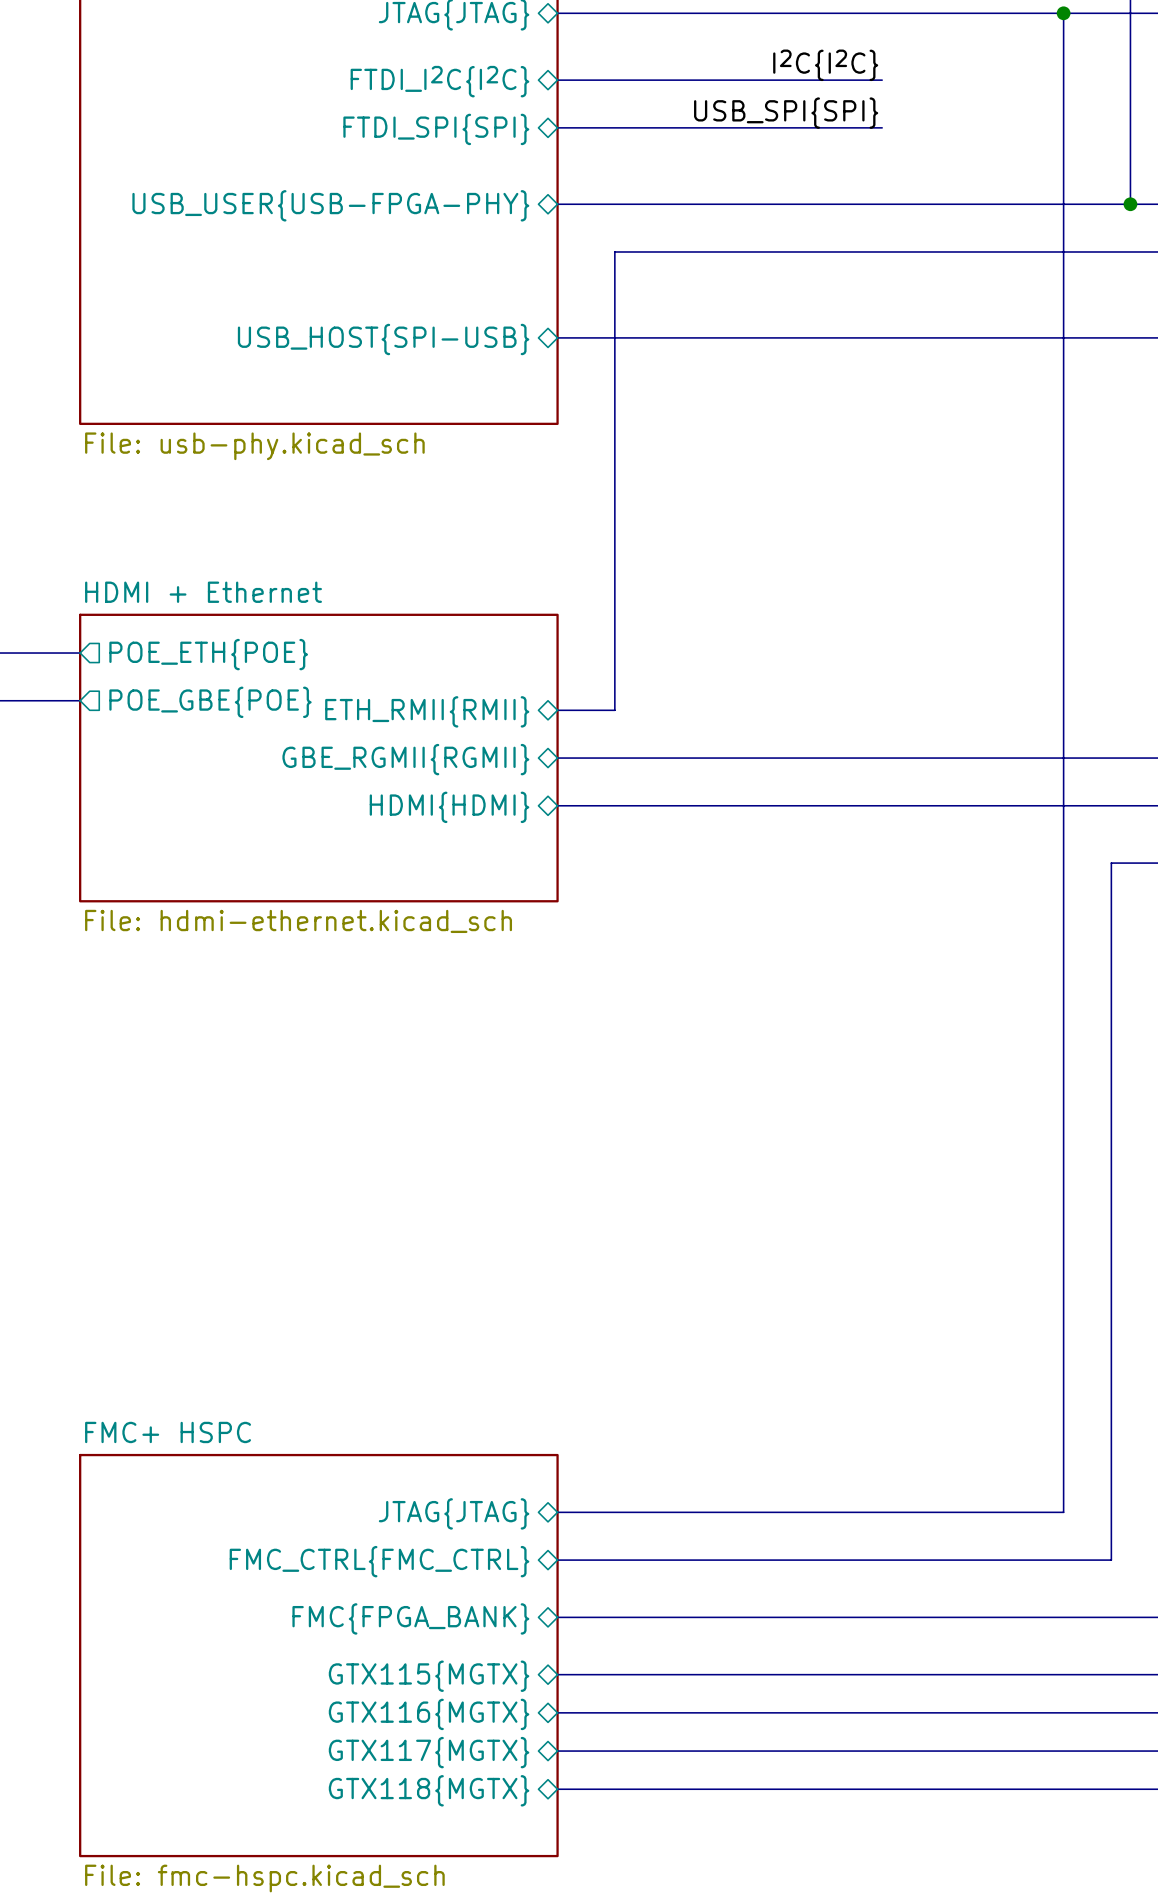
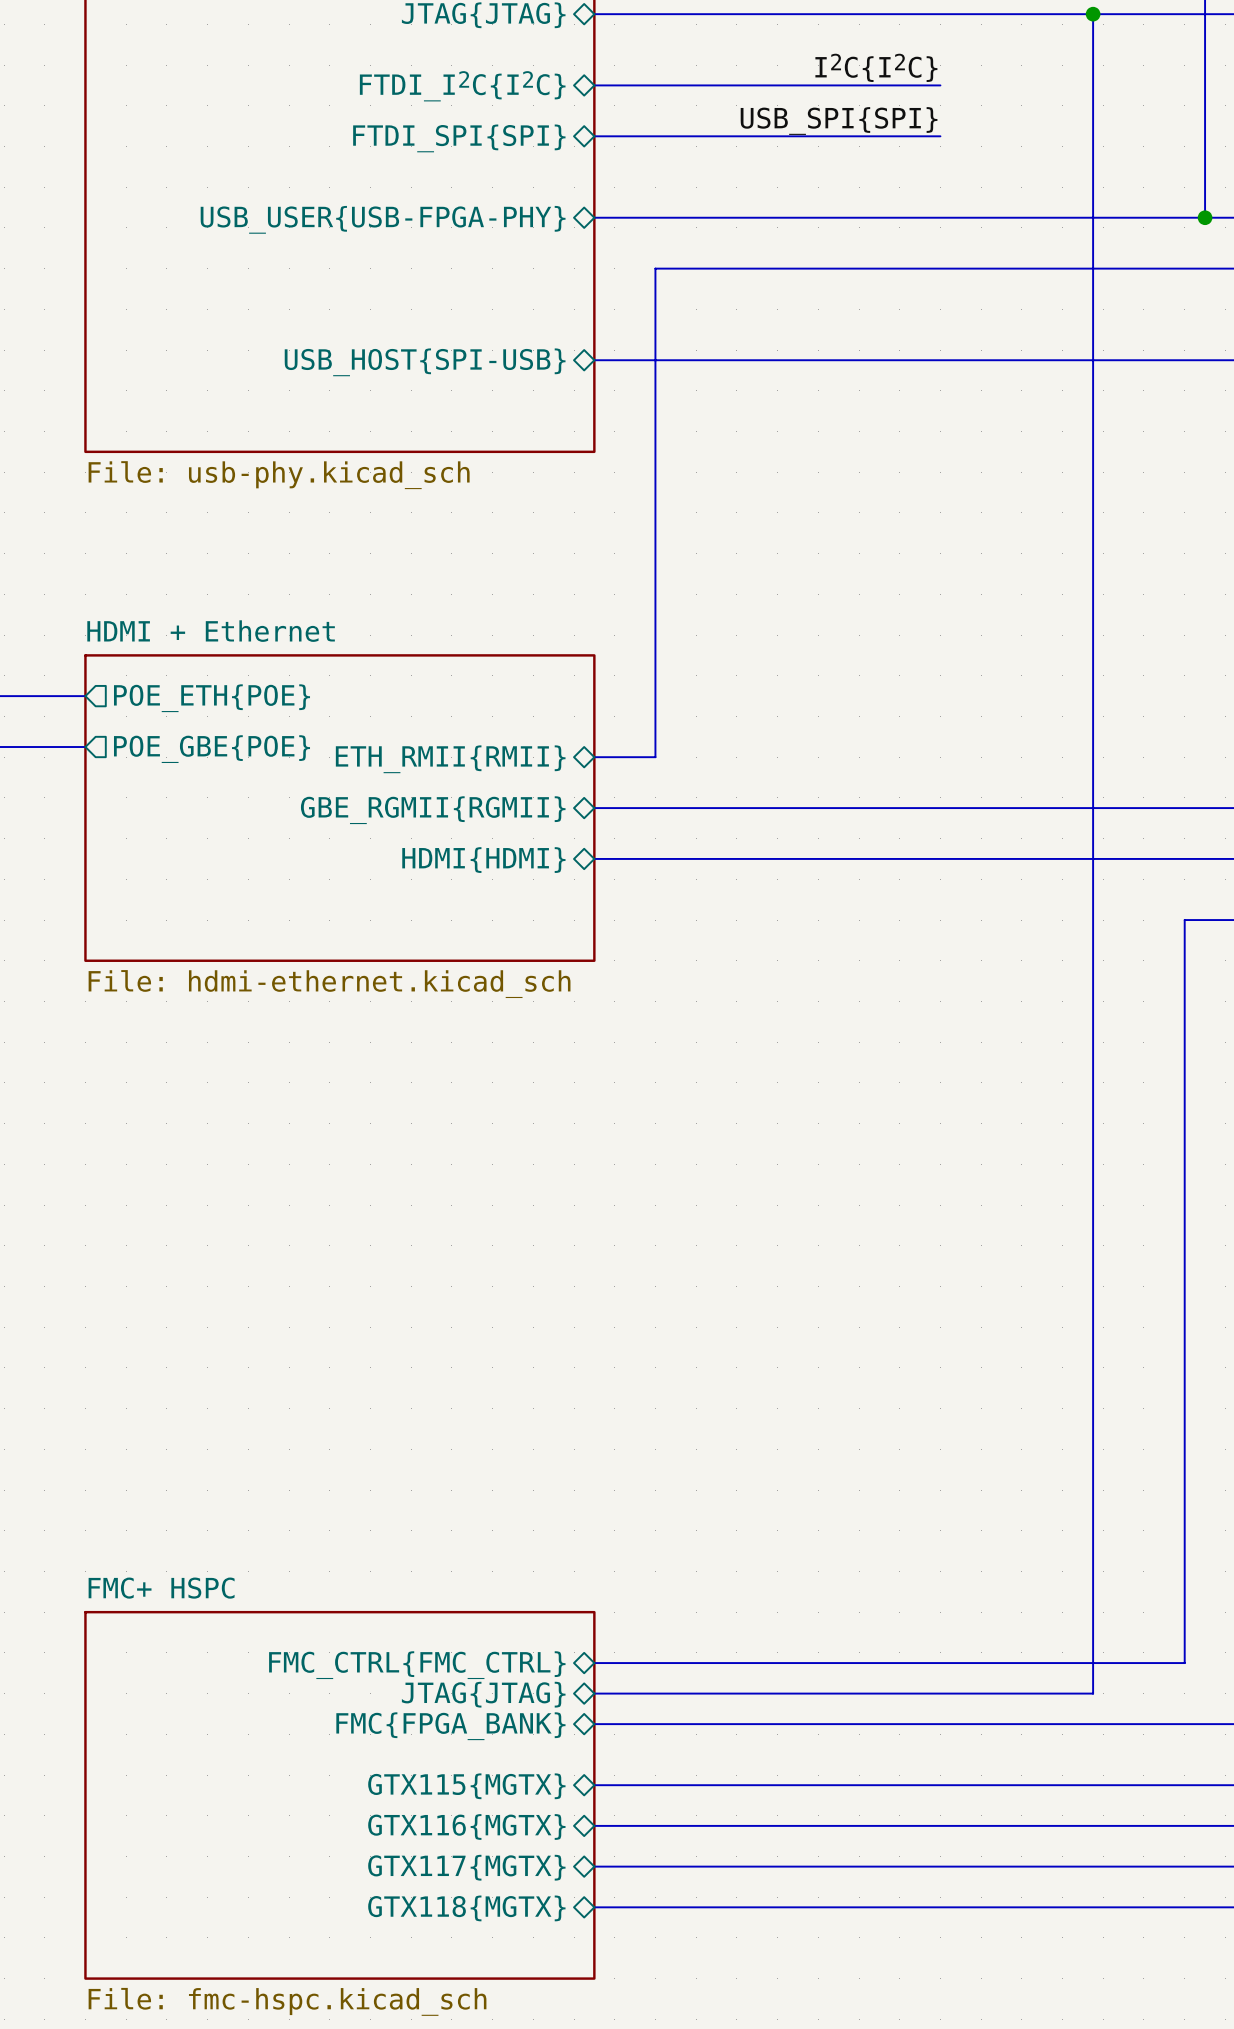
bus: none -> (1093, 14) (1093, 1693) (594, 1693)
bus: (1063, 13) (1063, 1512) (557, 1512) -> none
junction position: (1063, 13) -> (1093, 14)
sheet pin position: JTAG{JTAG} (454, 1513) -> JTAG{JTAG} (483, 1694)
sheet FMC+ HSPC: File: fmc-hspc.kicad_sch (318, 1655) -> none
sheet FMC+ HSPC: none -> File: fmc-hspc.kicad_sch (339, 1795)

